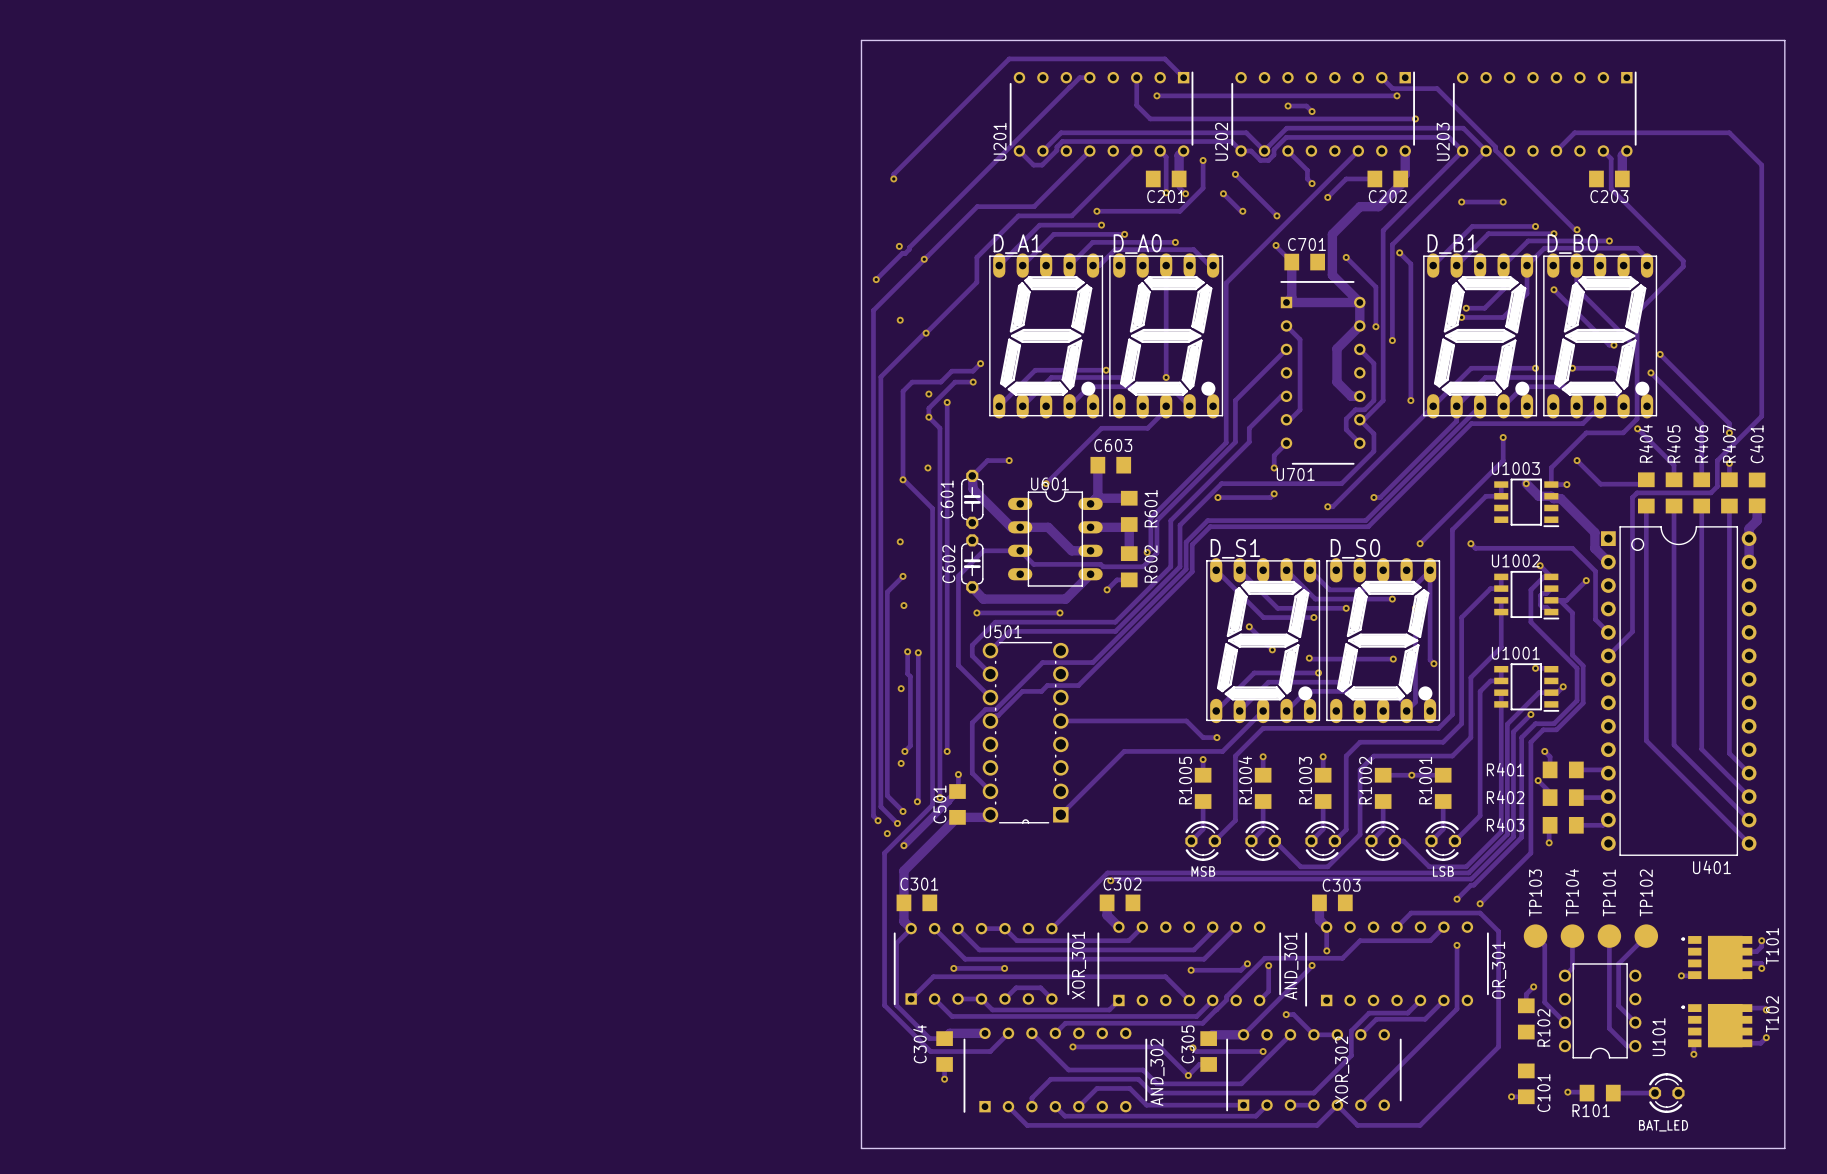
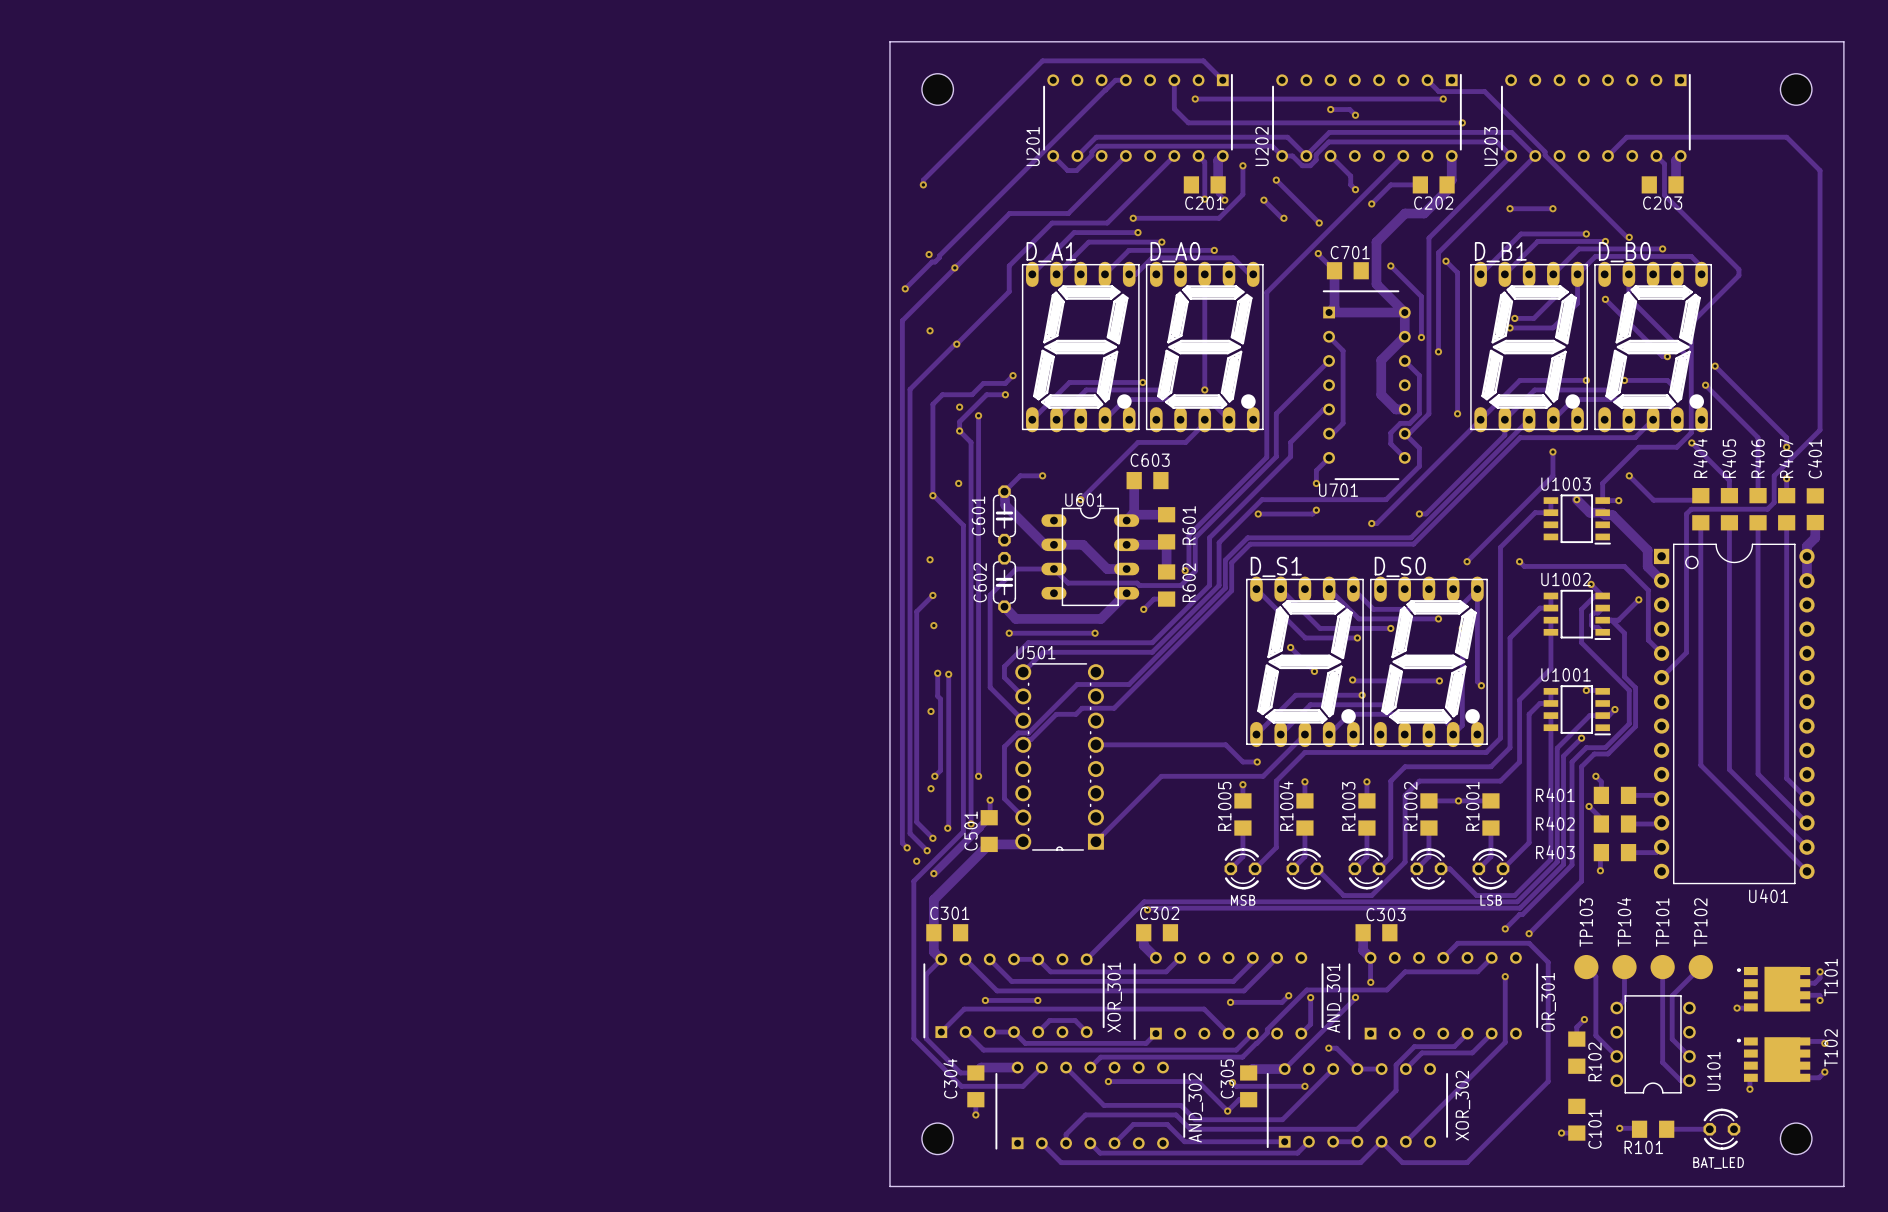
hole: none -> (937, 89)
hole: none -> (1796, 89)
XOR_302 name position: XOR_302 (1342, 1070) -> XOR_302 (1462, 1105)
hole: none -> (937, 1138)
hole: none -> (1796, 1138)

